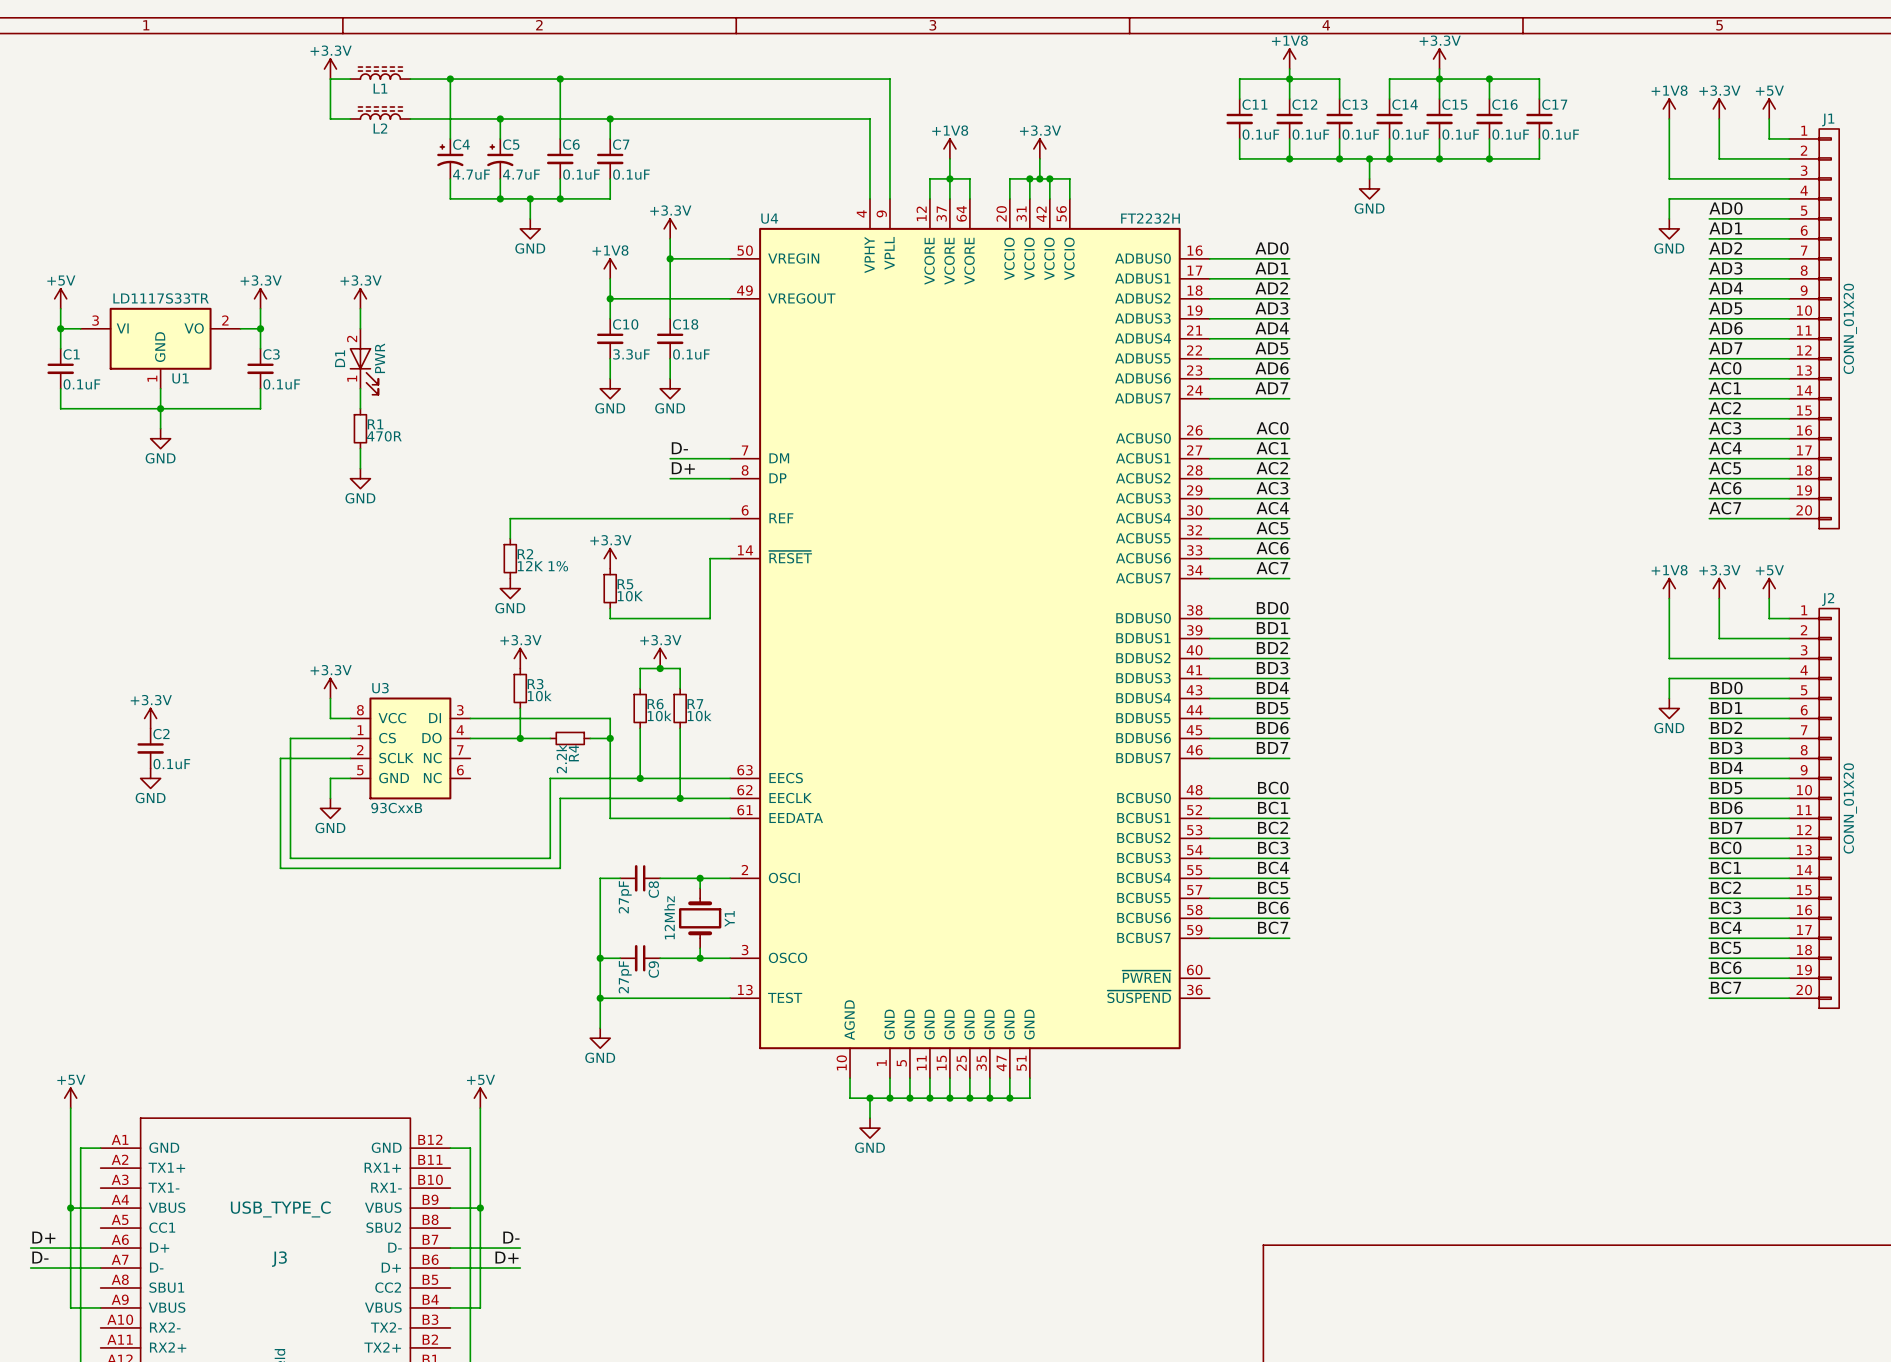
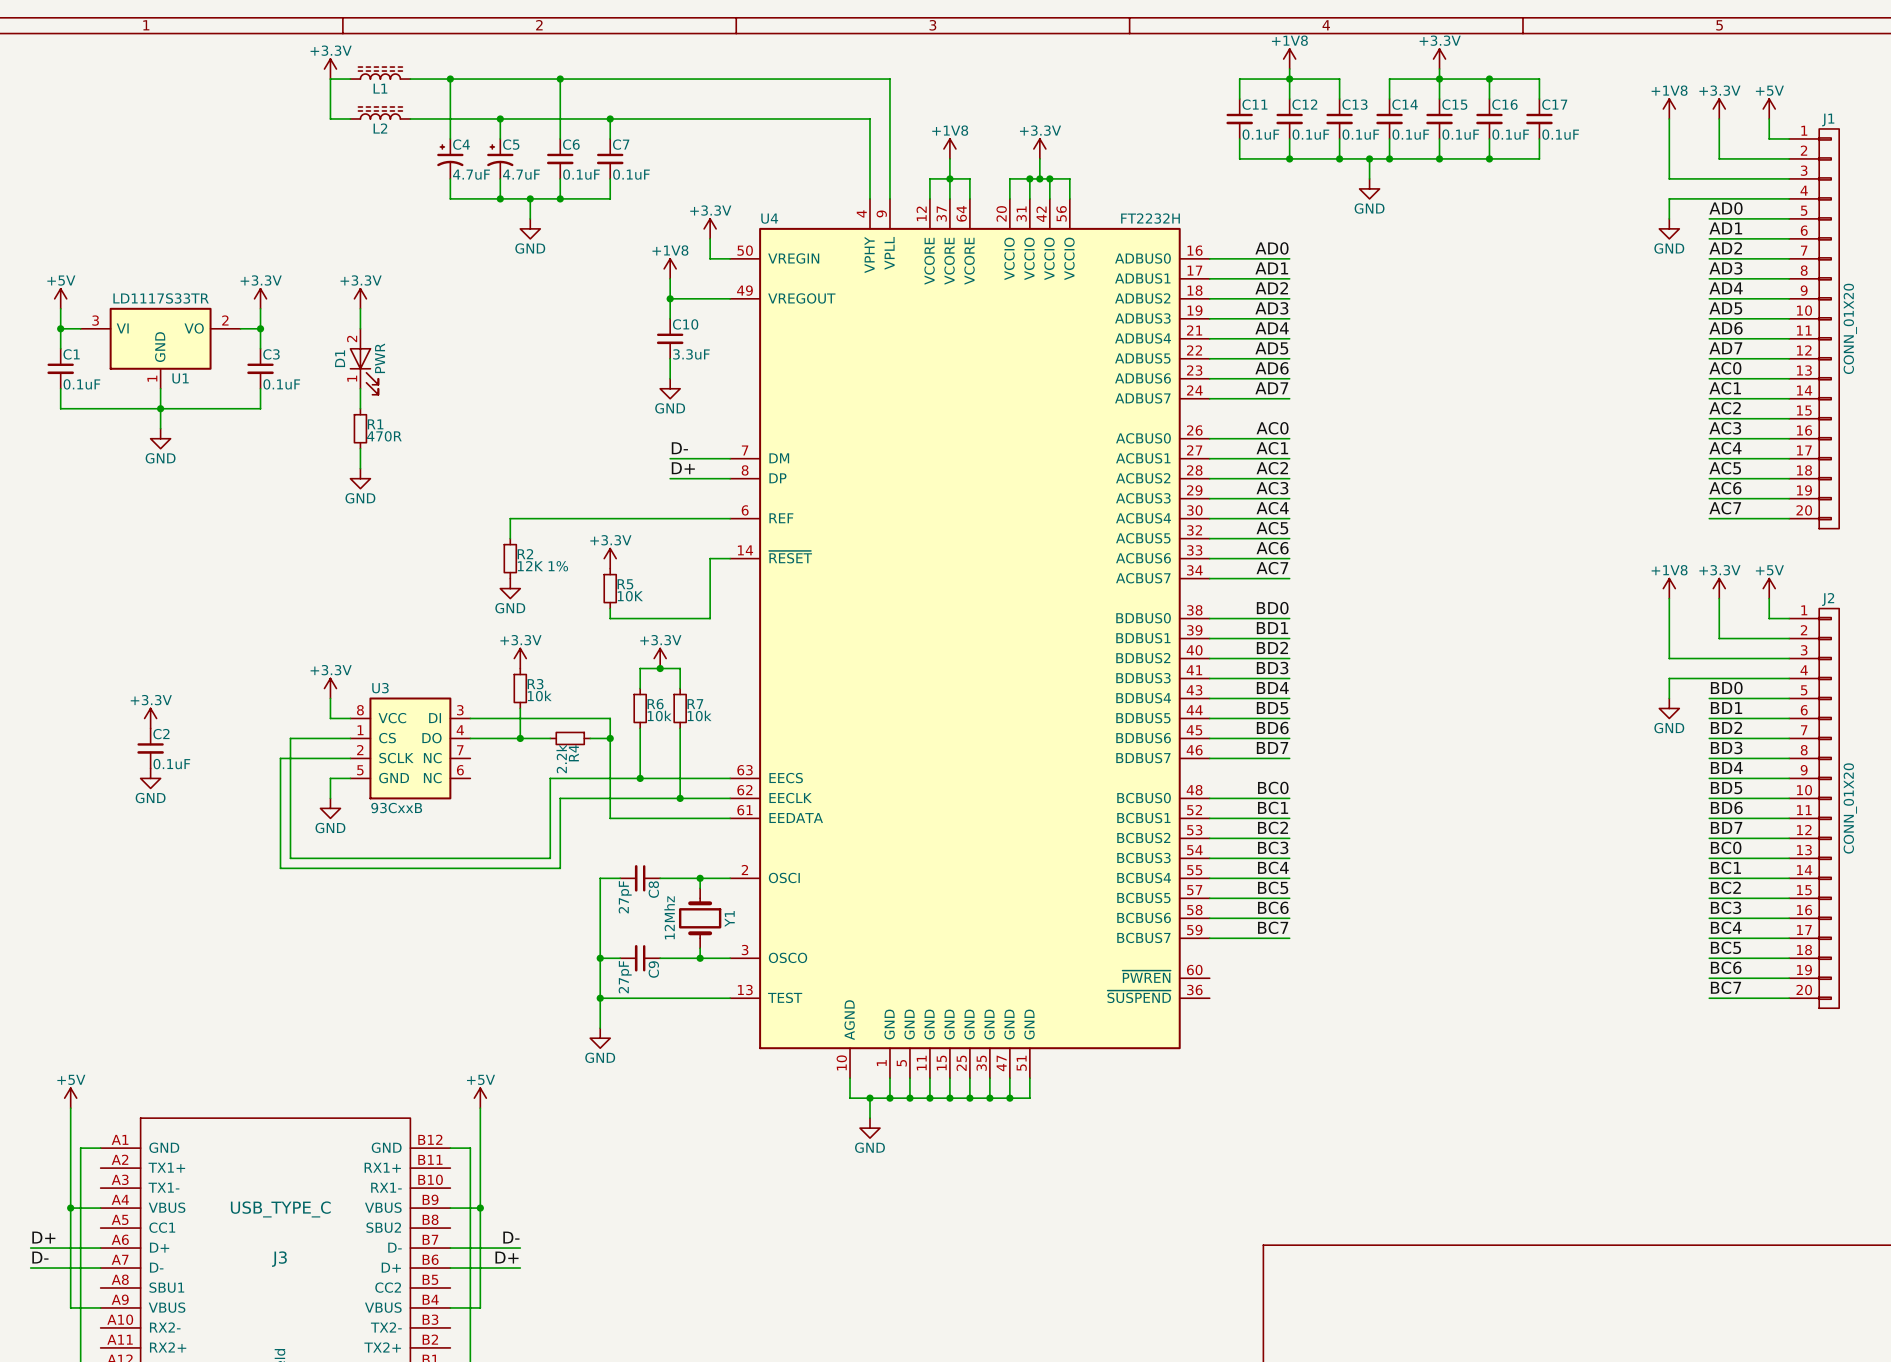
power symbol position: +3.3V (670, 228) -> +3.3V (710, 228)
wire: (670, 258) (710, 258) -> (710, 238) (710, 258)
junction: (670, 258) -> none
power symbol position: +1V8 (610, 268) -> +1V8 (670, 268)
wire: (610, 278) (610, 318) -> none
wire: (610, 298) (670, 298) -> none
junction: (610, 298) -> none
junction: none -> (670, 298)
C18 name: C18 (685, 324) -> C10 (685, 324)
C10: 3.3uF (610, 338) -> none
C18 value: 0.1uF (691, 354) -> 3.3uF (691, 354)
wire: (610, 358) (610, 378) -> none
power symbol: GND (610, 388) -> none

